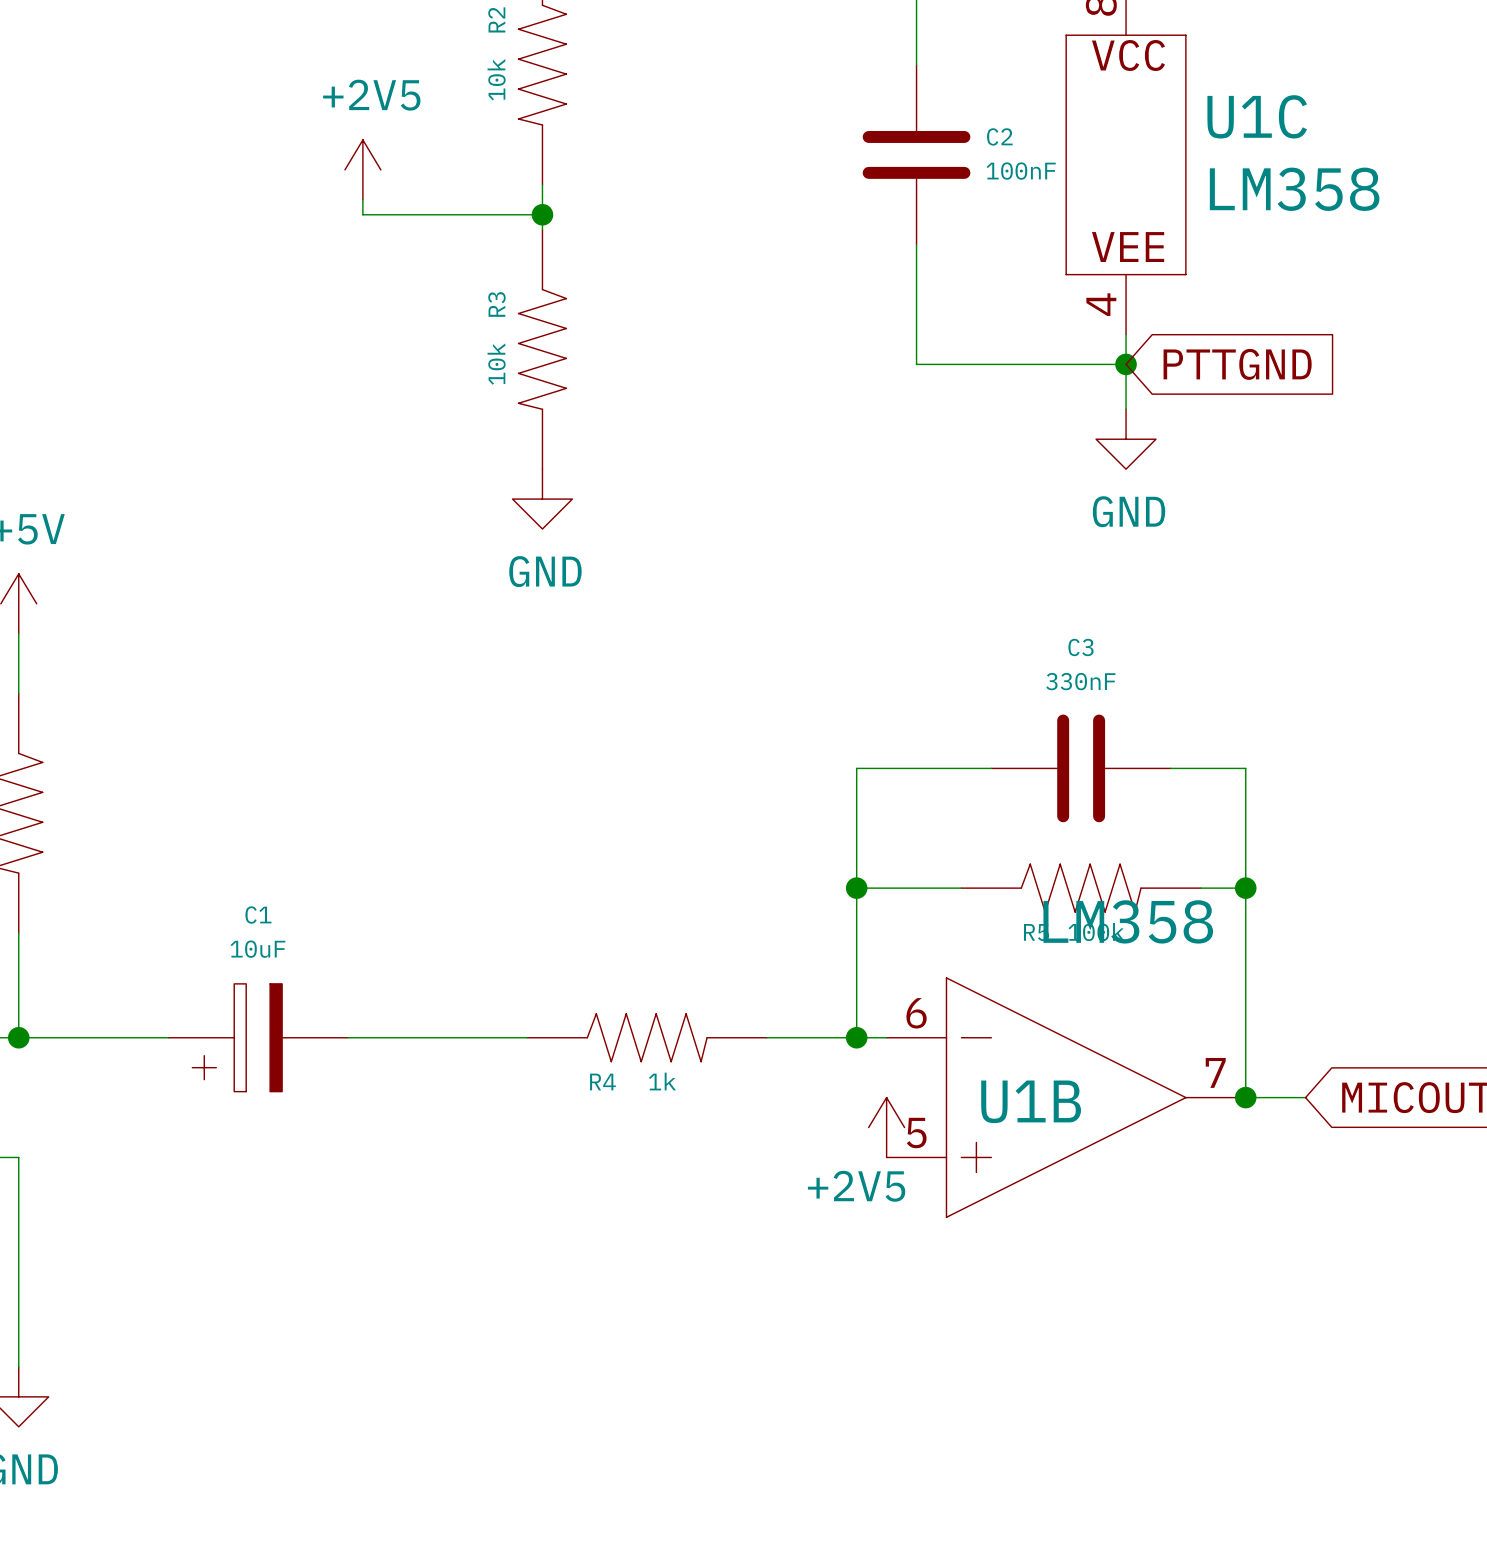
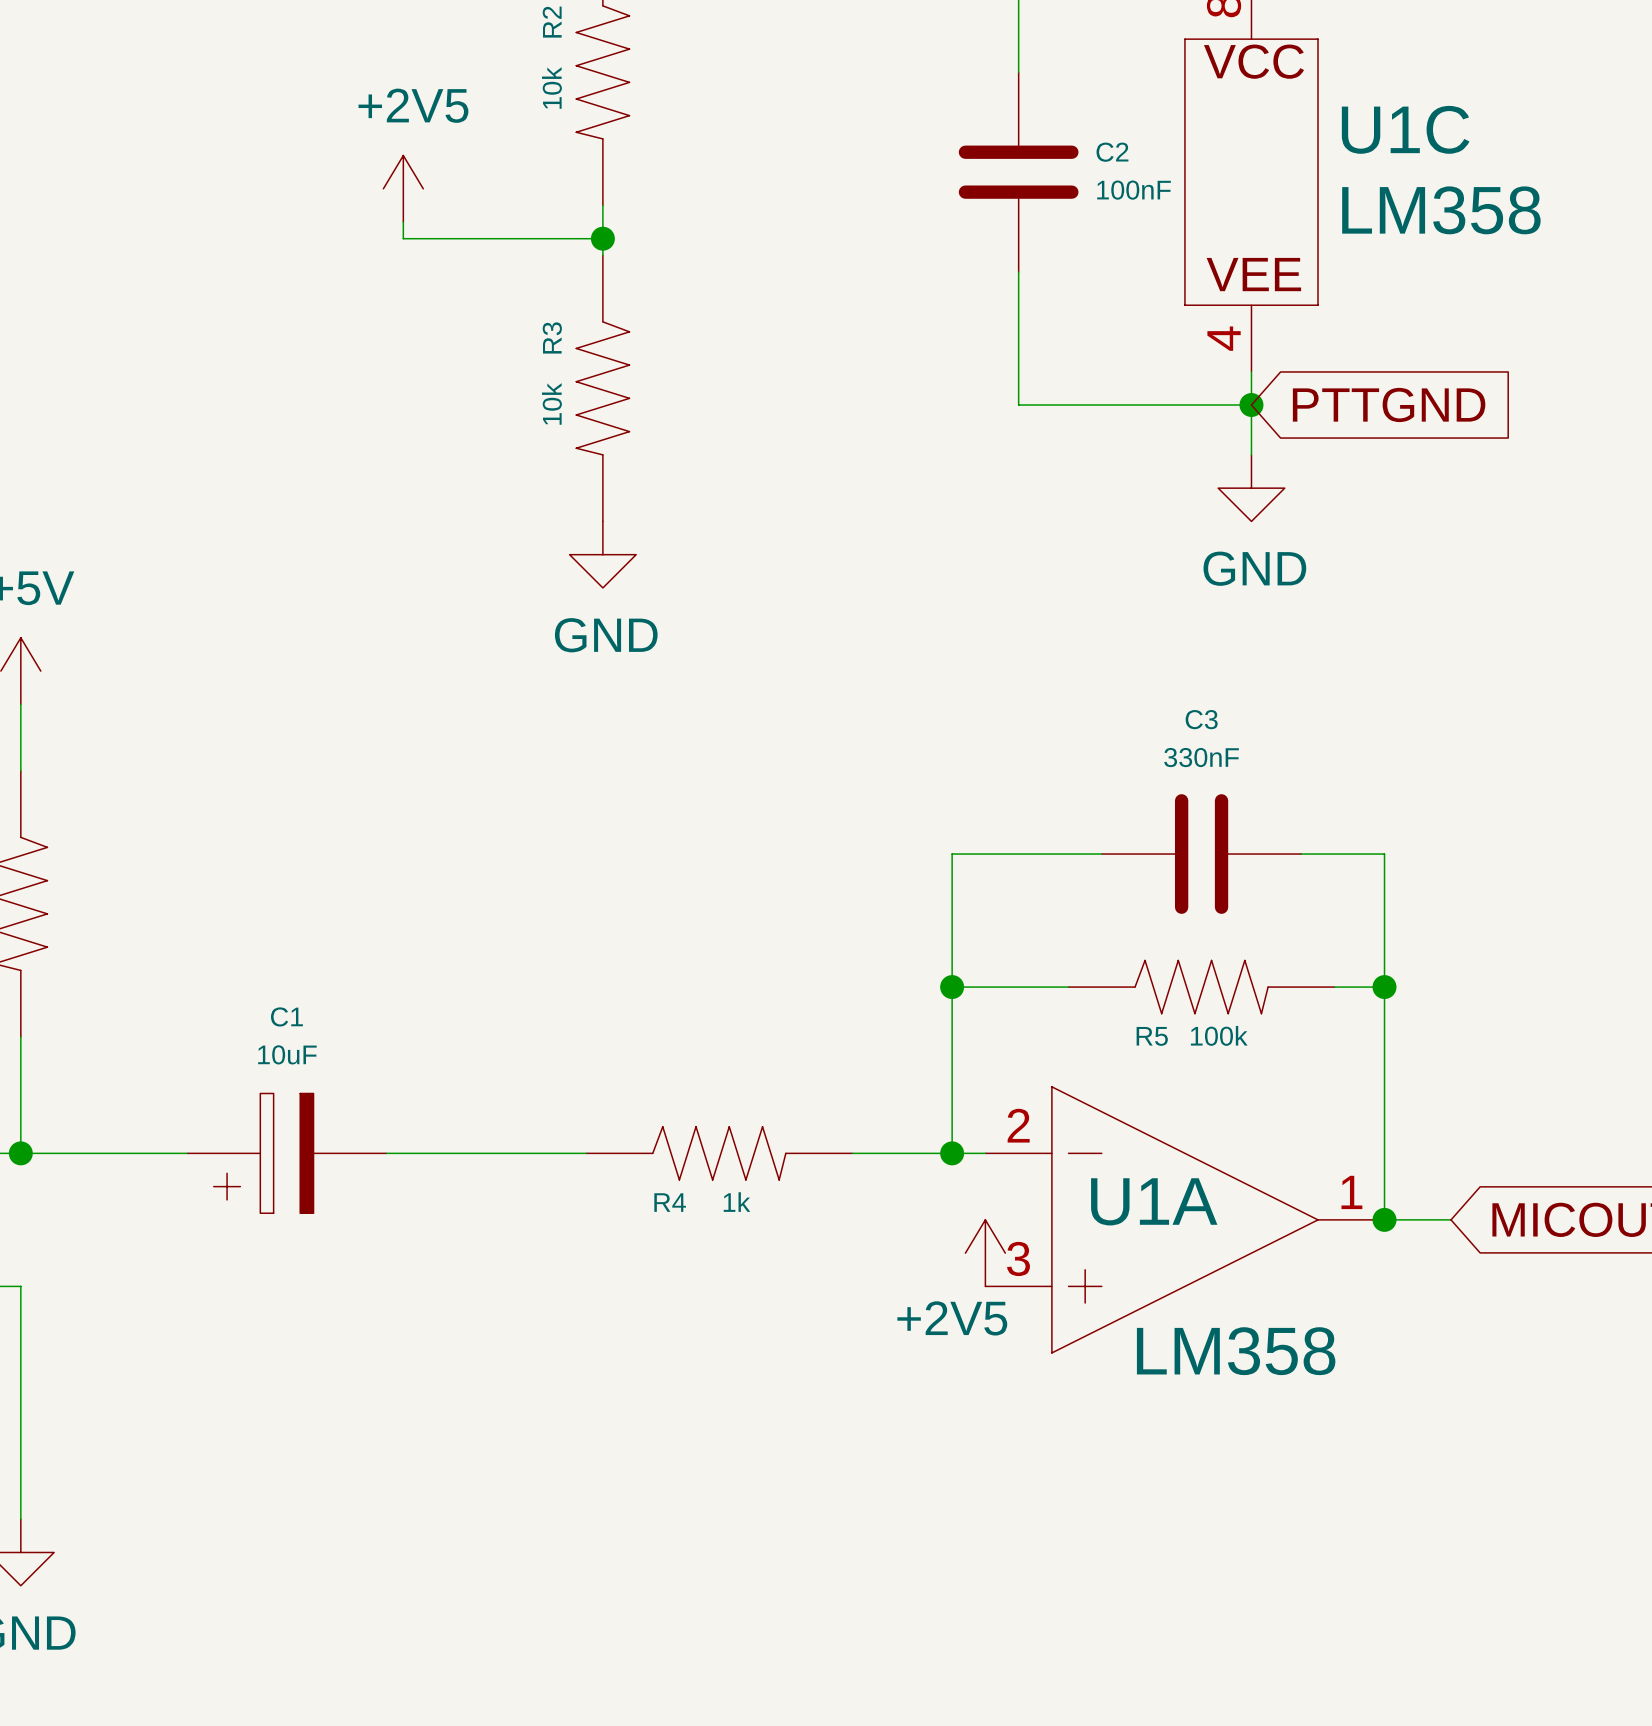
U1B value position: LM358 (1128, 921) -> LM358 (1236, 1351)
U1B pin number: 6 (916, 1013) -> 2 (1018, 1125)
U1B pin number: 7 (1215, 1072) -> 1 (1351, 1192)
U1B name: U1B (1031, 1101) -> U1A (1154, 1201)
U1B pin number: 5 (916, 1133) -> 3 (1018, 1258)

